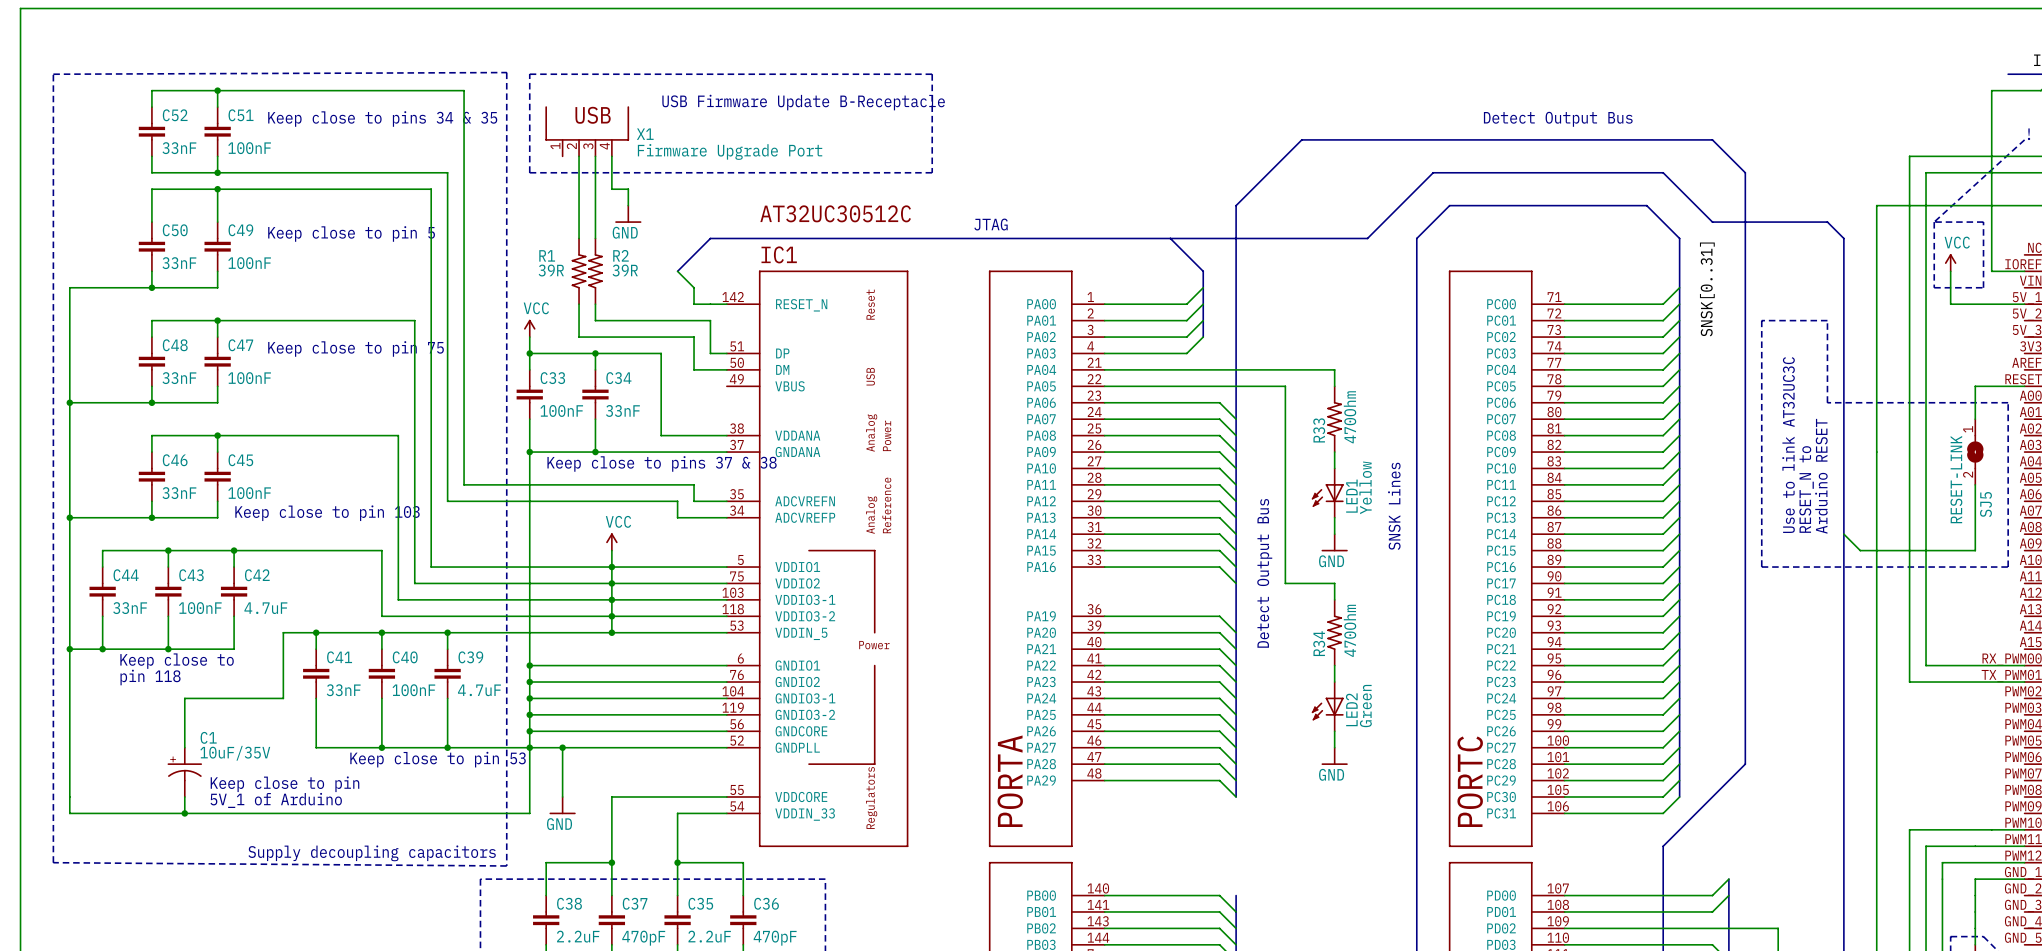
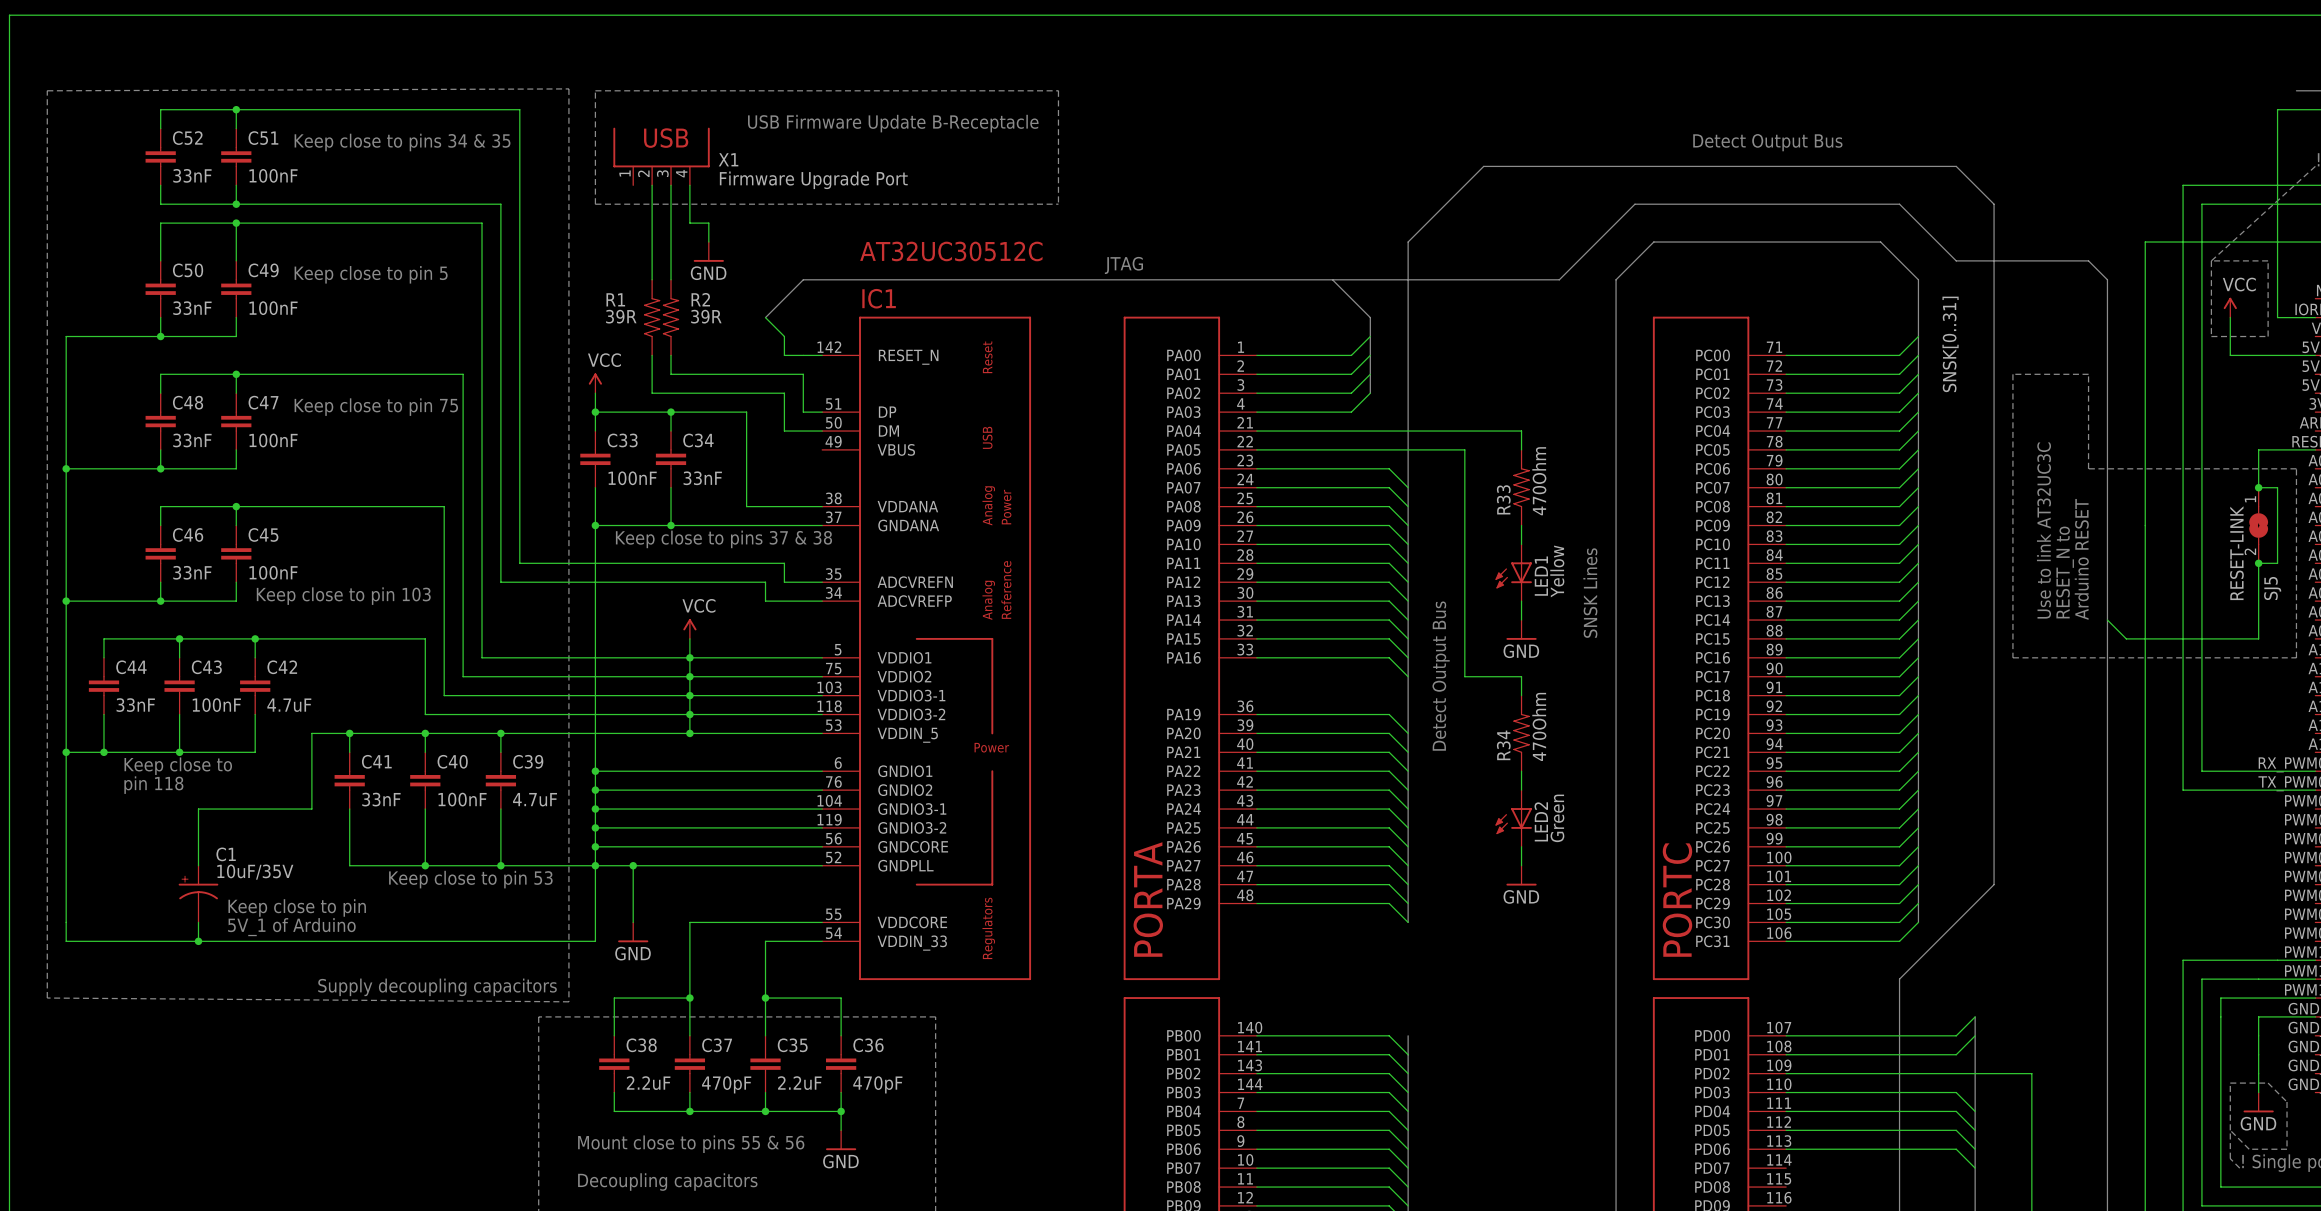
wire: none -> (2258, 487) (2277, 487) (2277, 563) (2258, 563)
junction: none -> (2258, 487)
junction: none -> (2258, 563)

